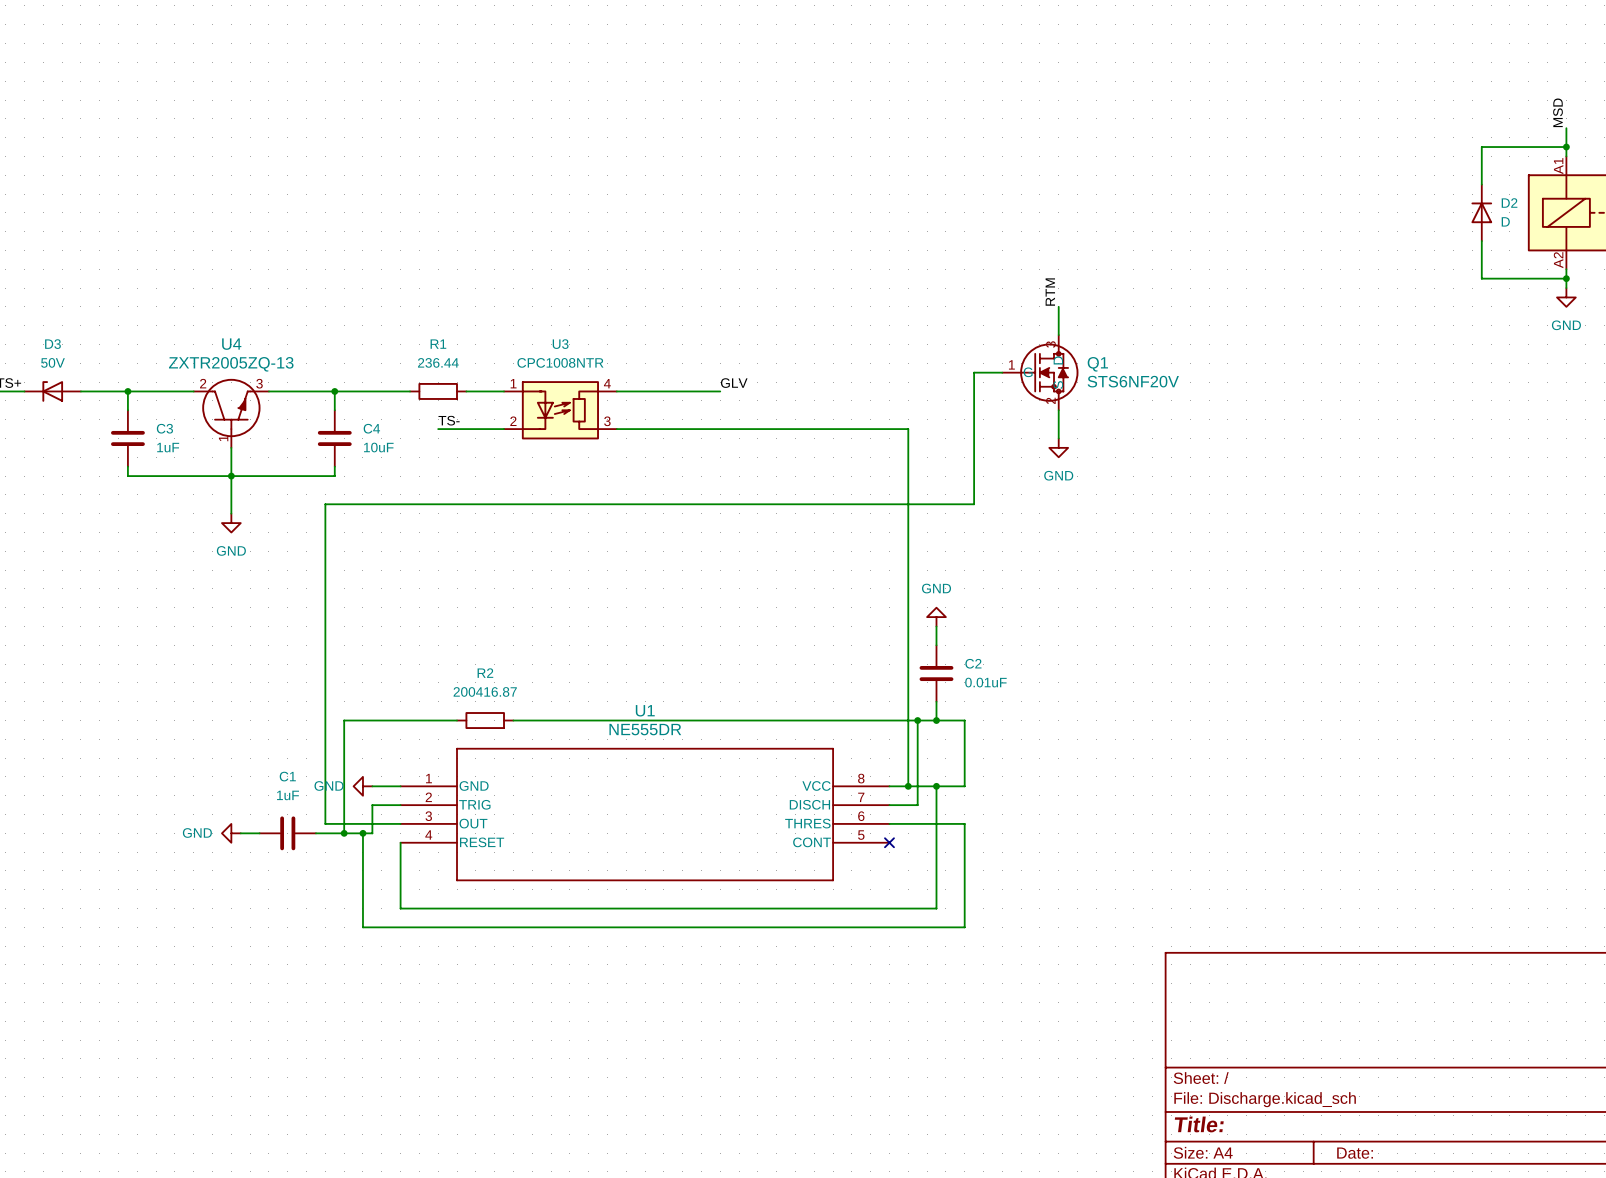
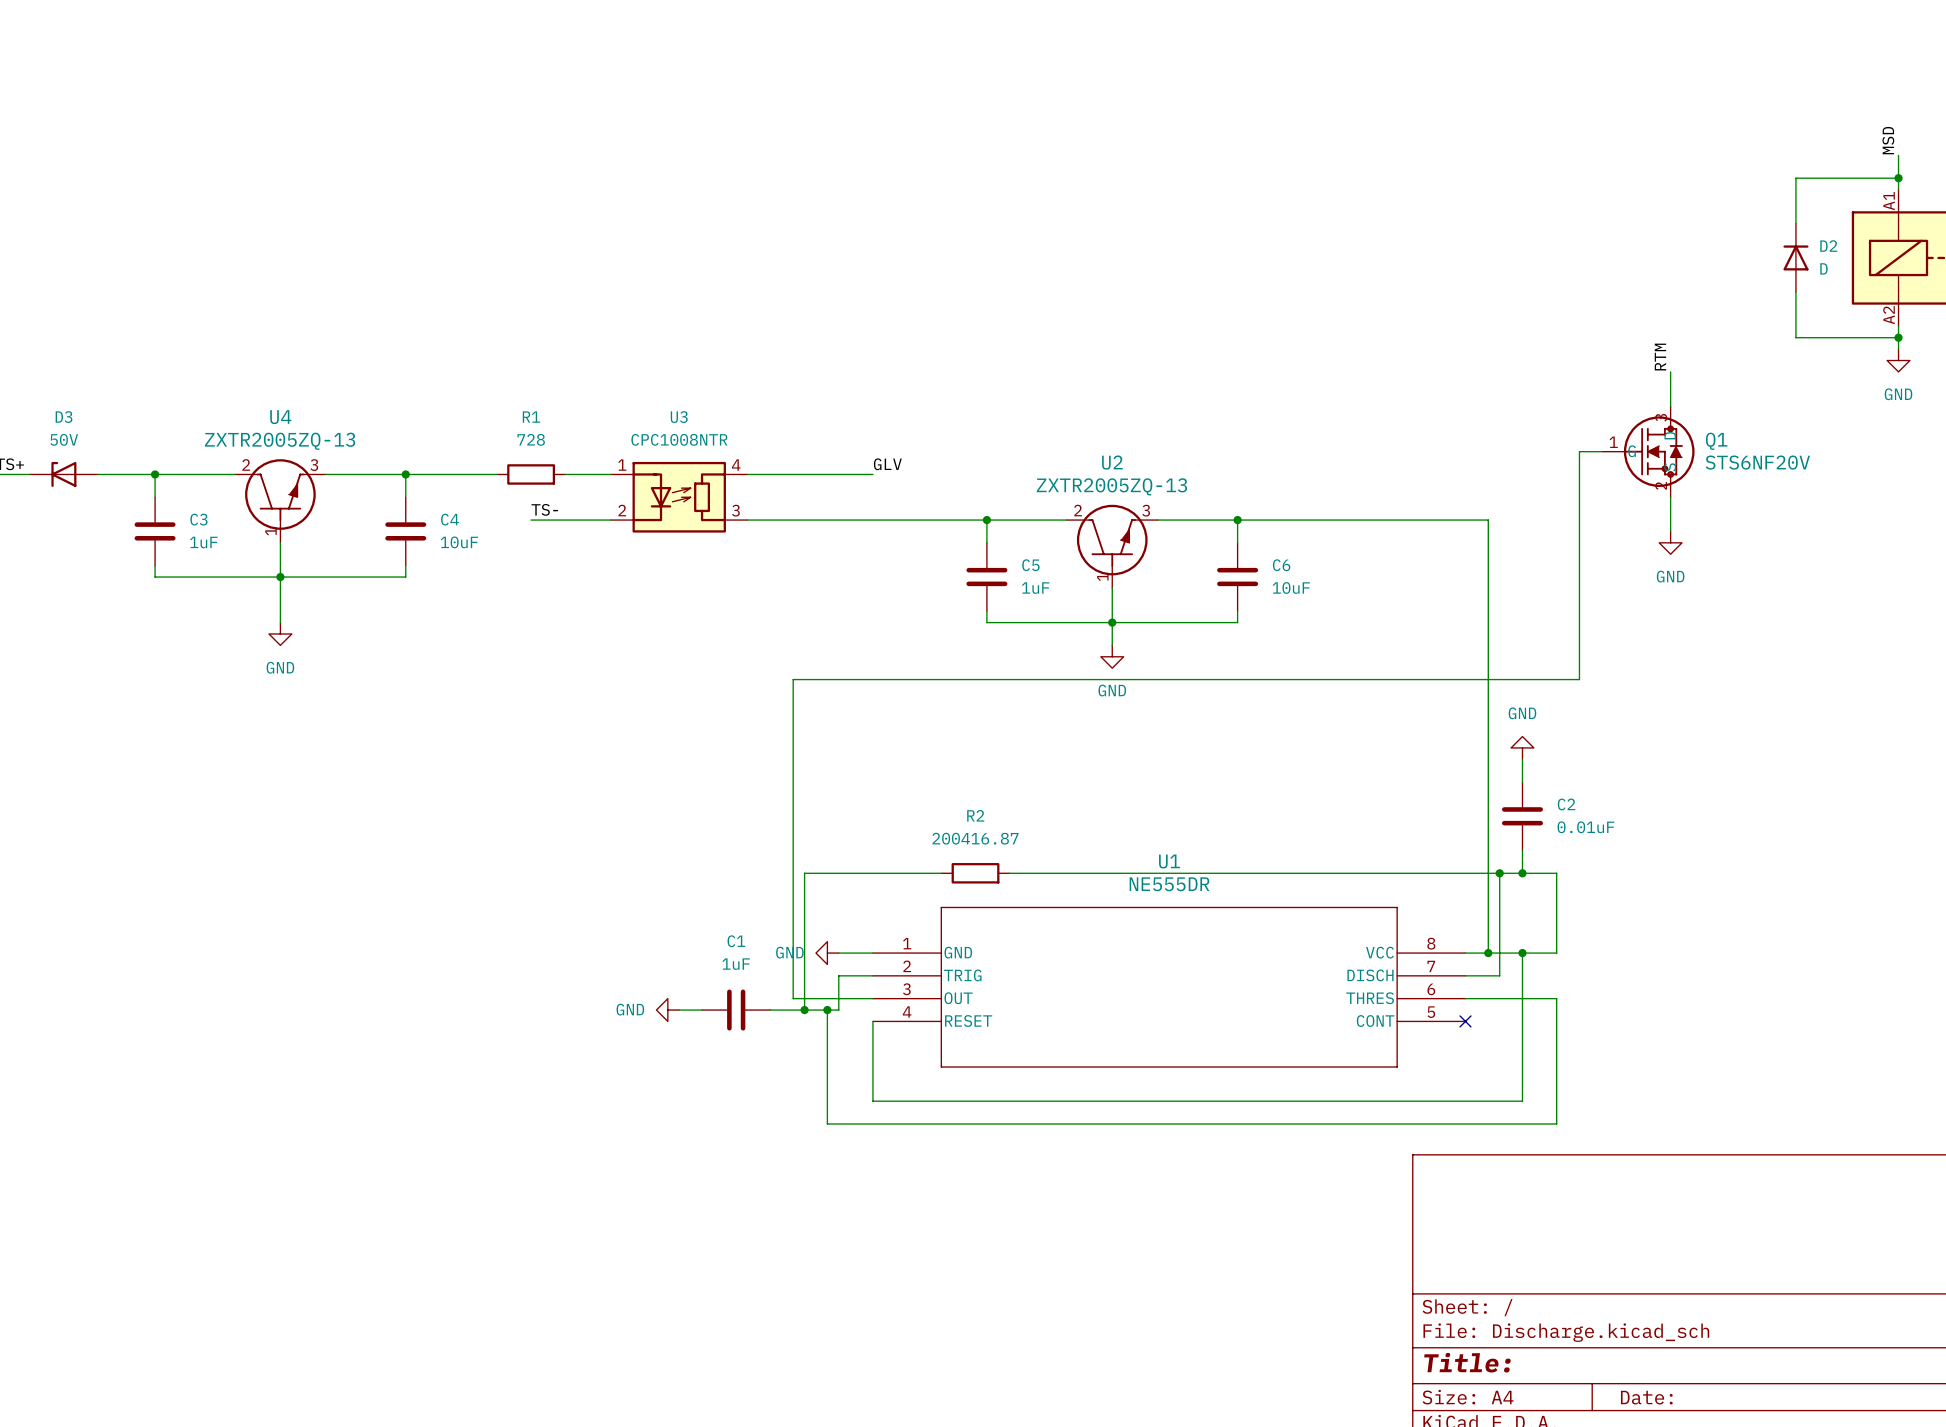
label: RTM (1050, 292) -> none
label: none -> RTM (1660, 357)
wire: (1058, 306) (1058, 335) -> none
wire: none -> (1670, 371) (1670, 406)
R1 value: 236.44 (438, 362) -> 728 (531, 439)
wire: (1002, 372) (974, 372) (974, 504) (325, 504) (325, 823) (400, 823) -> none
Q1 position: (1040, 372) -> (1648, 451)
wire: none -> (1602, 451) (1579, 451) (1579, 679) (793, 679) (793, 998) (872, 998)
wire: (1058, 410) (1058, 438) -> none
wire: none -> (1670, 497) (1670, 531)
wire: none -> (986, 520) (986, 542)
junction: none -> (986, 520)
wire: (880, 429) (908, 429) (908, 786) -> none
wire: none -> (1157, 520) (1488, 520) (1488, 953)
wire: none -> (1237, 520) (1237, 542)
junction: none -> (1237, 520)
power symbol: GND (1058, 447) -> none
power symbol: none -> GND (1670, 542)
U2: none -> ZXTR2005ZQ-13 (1112, 546)
C5: none -> 1uF (986, 577)
C6: none -> 10uF (1237, 577)
wire: none -> (1112, 588) (1112, 645)
wire: none -> (986, 611) (986, 622) (1237, 622) (1237, 611)
junction: none -> (1112, 622)
power symbol rotation: 0° (936, 617) -> 180° (1112, 656)
power symbol position: GND (936, 617) -> GND (1112, 656)
power symbol: none -> GND (1522, 747)
wire: (936, 626) (936, 645) -> none
wire: none -> (1522, 759) (1522, 782)
C2 position: (936, 673) -> (1522, 816)
wire: (936, 701) (936, 720) -> none
wire: none -> (1522, 850) (1522, 873)
wire: (457, 720) (344, 720) (344, 833) -> none
R2 position: (485, 720) -> (975, 873)
wire: (513, 720) (663, 720) -> (804, 1010) (804, 873)
wire: (776, 720) (833, 720) -> none
wire: (917, 720) (917, 805) (889, 805) -> none
junction: (917, 720) -> none
junction: (936, 720) -> none
wire: (964, 720) (964, 786) (889, 786) -> (1169, 873) (1556, 873) (1556, 953) (1465, 953)
wire: none -> (1499, 873) (1499, 975) (1465, 975)
junction: none -> (1499, 873)
junction: none -> (1522, 873)
power symbol: GND (362, 786) -> none
wire: (372, 786) (400, 786) -> none
power symbol: none -> GND (827, 953)
wire: none -> (838, 953) (872, 953)
junction: (908, 786) -> none
wire: (936, 786) (936, 908) -> (1522, 953) (1522, 1101) (1135, 1101)
junction: (936, 786) -> none
junction: none -> (1488, 953)
junction: none -> (1522, 953)
wire: (400, 805) (372, 805) (372, 833) (315, 833) -> none
wire: none -> (872, 975) (838, 975) (838, 1010) (770, 1010)
U1 position: (645, 814) -> (1169, 987)
wire: (889, 823) (964, 823) (964, 927) -> (1465, 998) (1556, 998) (1556, 1123) (1169, 1123)
power symbol: GND (231, 833) -> none
wire: (240, 833) (259, 833) -> none
C1 position: (287, 833) -> (736, 1010)
junction: (344, 833) -> none
wire: (362, 833) (362, 927) (682, 927) -> (827, 1010) (827, 1123)
junction: (362, 833) -> none
power symbol: none -> GND (667, 1010)
wire: none -> (679, 1010) (702, 1010)
junction: none -> (804, 1010)
junction: none -> (827, 1010)
wire: (400, 842) (400, 908) (720, 908) -> (872, 1021) (872, 1101)
no-connect mark: (889, 842) -> none
no-connect mark: none -> (1465, 1021)

